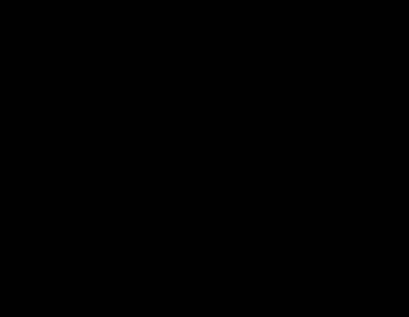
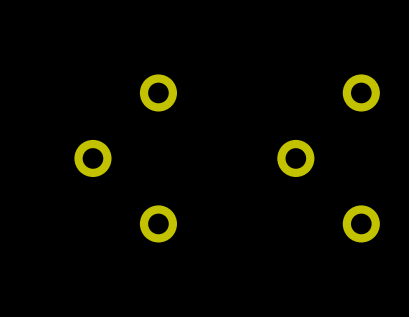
part: none -> (125, 158)
part: none -> (328, 158)

